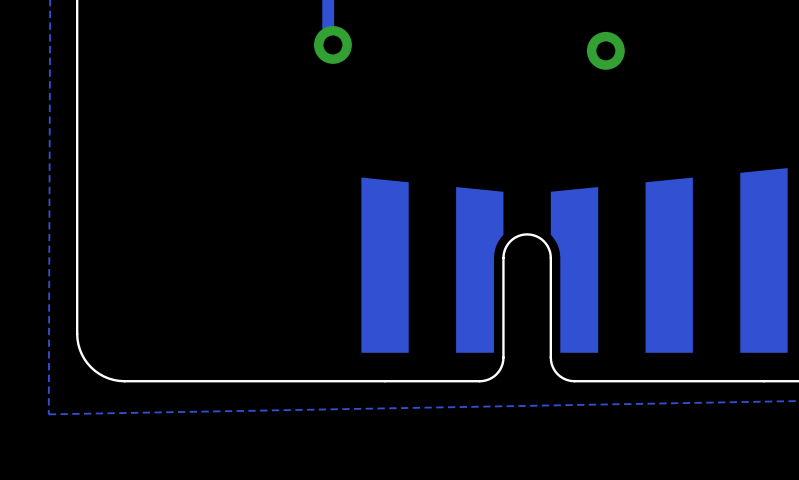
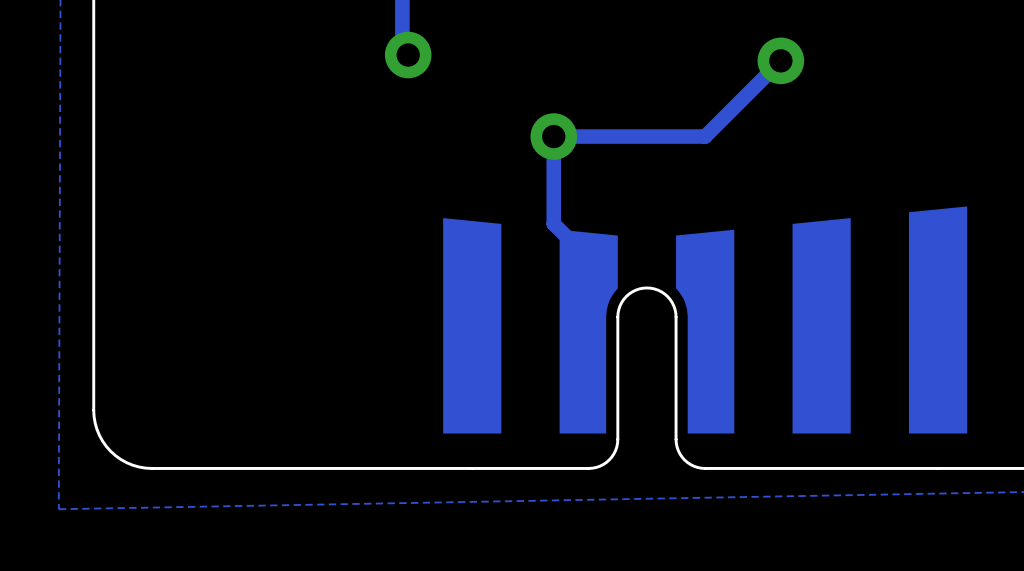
track: none -> (780, 60) (705, 136) (553, 136) (553, 223) (588, 258) (588, 346)
via position: (605, 50) -> (780, 60)
via: none -> (553, 136)

